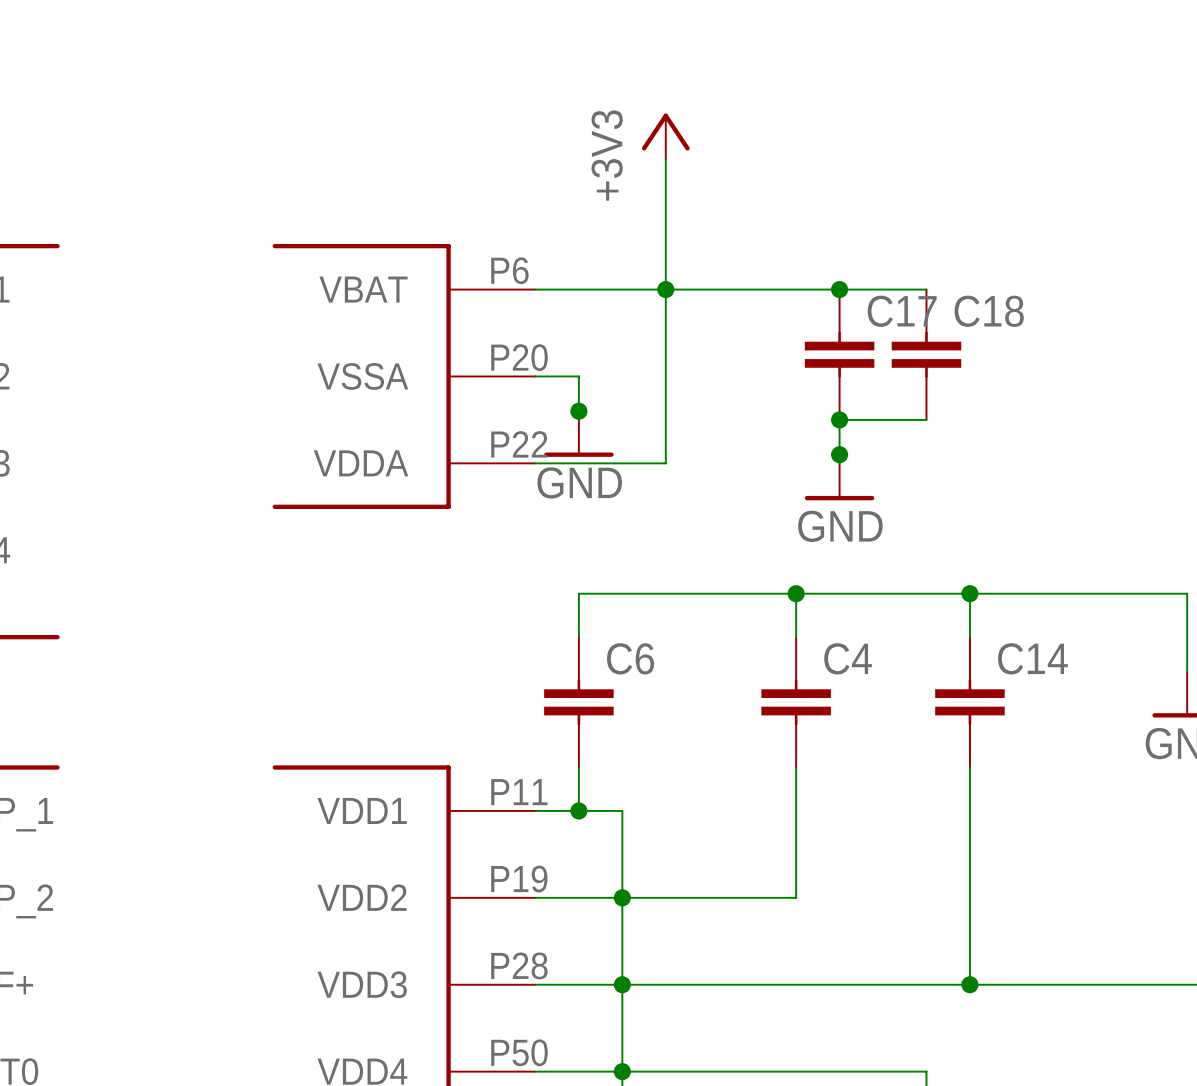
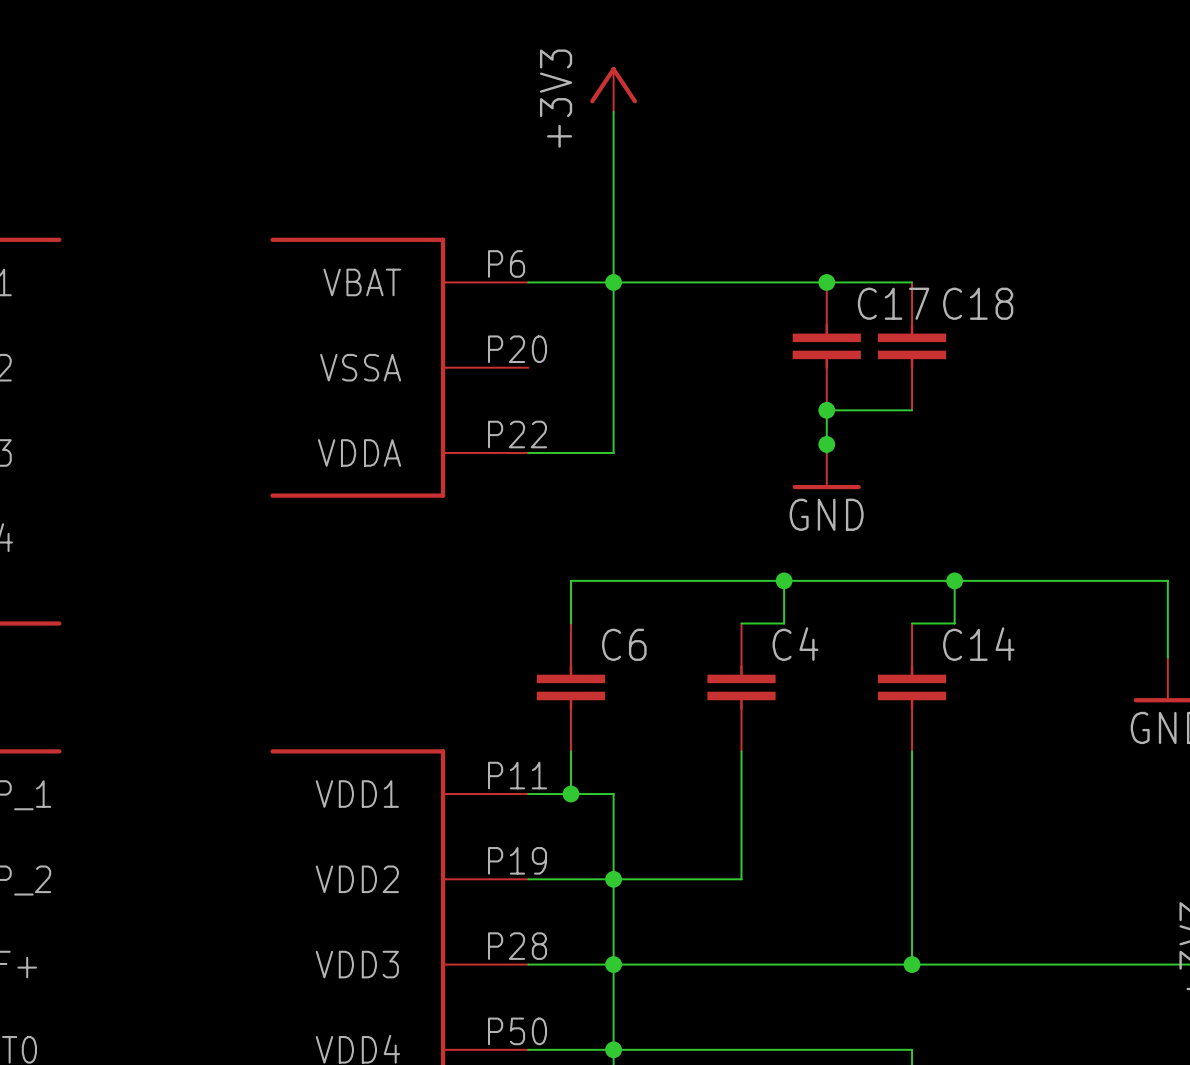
power symbol position: +3V3 (665, 136) -> +3V3 (613, 89)
wire: (665, 159) (665, 463) (622, 463) -> (613, 111) (613, 452)
junction position: (665, 289) -> (613, 282)
wire: (535, 376) (578, 376) (578, 419) -> none
junction: (578, 411) -> none
power symbol: GND (578, 434) -> none
wire: none -> (741, 623) (784, 623)
wire: none -> (912, 623) (954, 623)
C4 position: (796, 702) -> (741, 687)
C14 position: (969, 702) -> (912, 687)
wire: (796, 767) (796, 897) (752, 897) -> (741, 751) (741, 879)
wire: (969, 767) (969, 984) -> (912, 751) (912, 964)
junction position: (969, 984) -> (912, 964)

